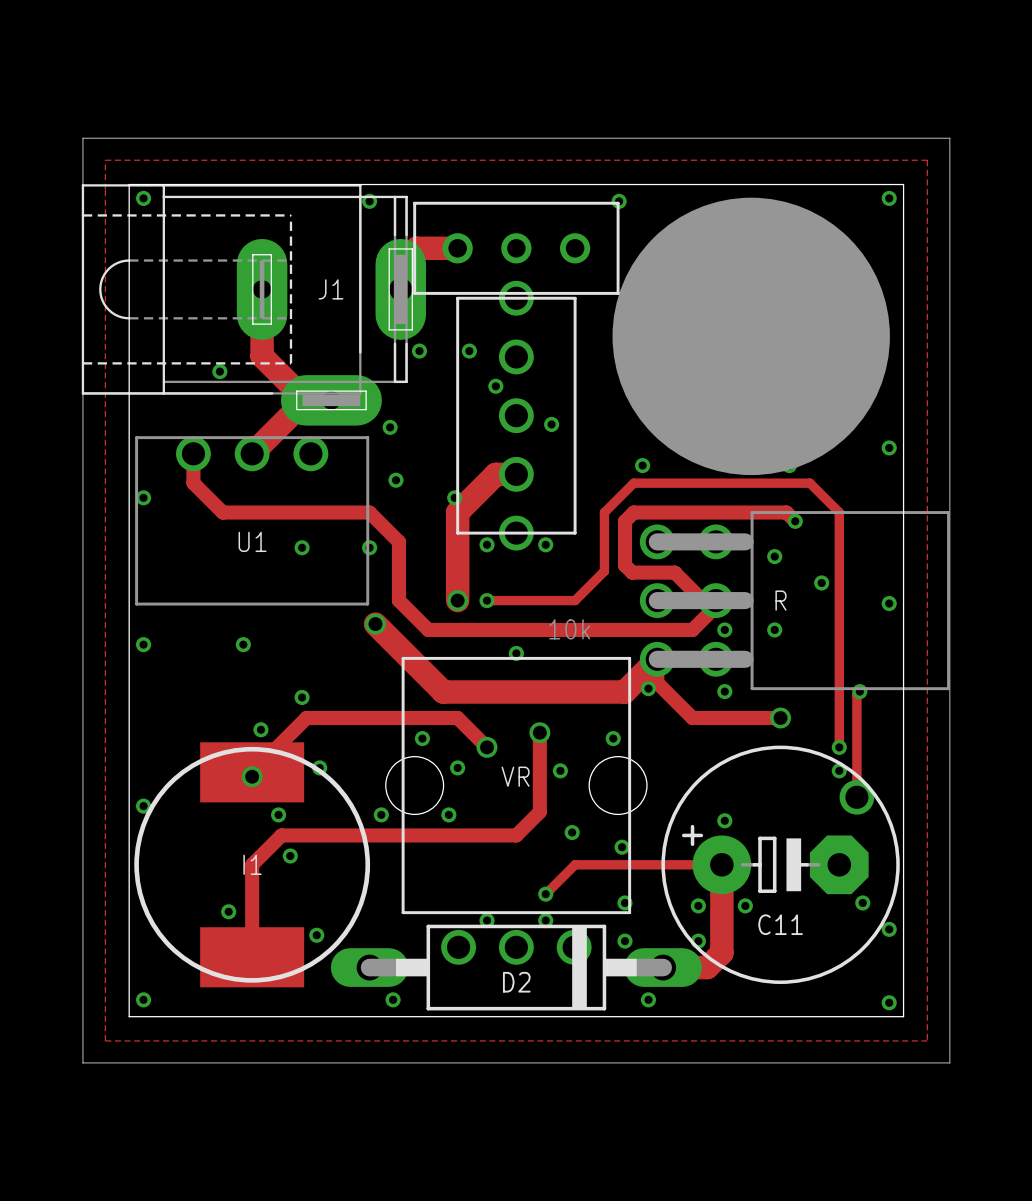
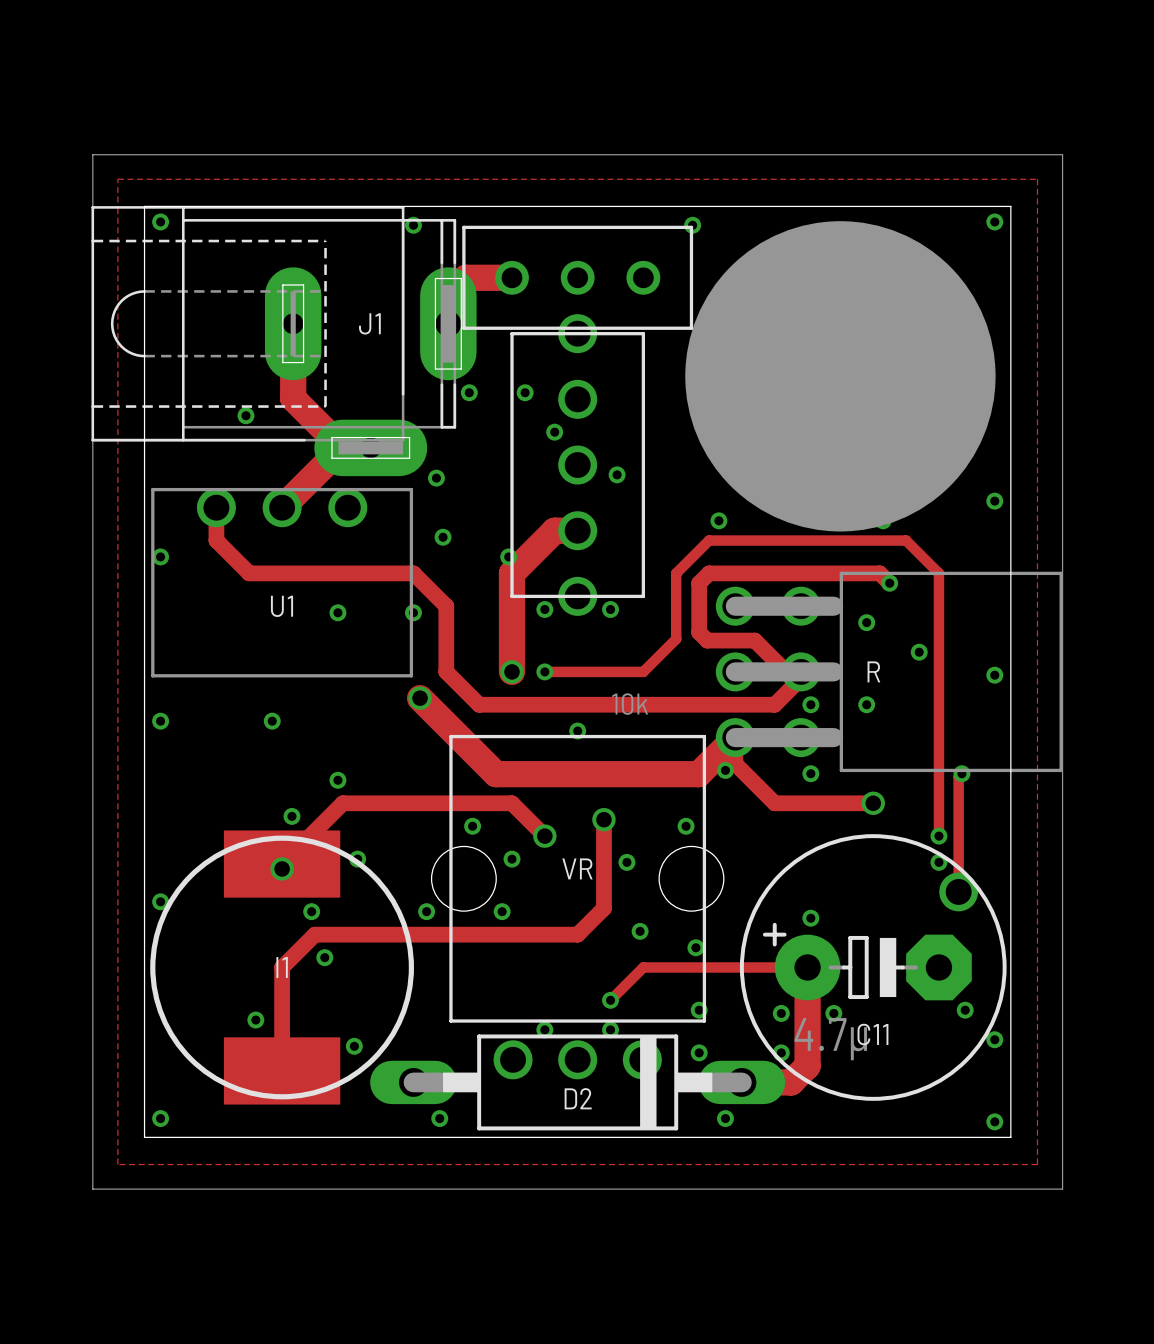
C11 value: none -> 4.7µ (830, 1039)

